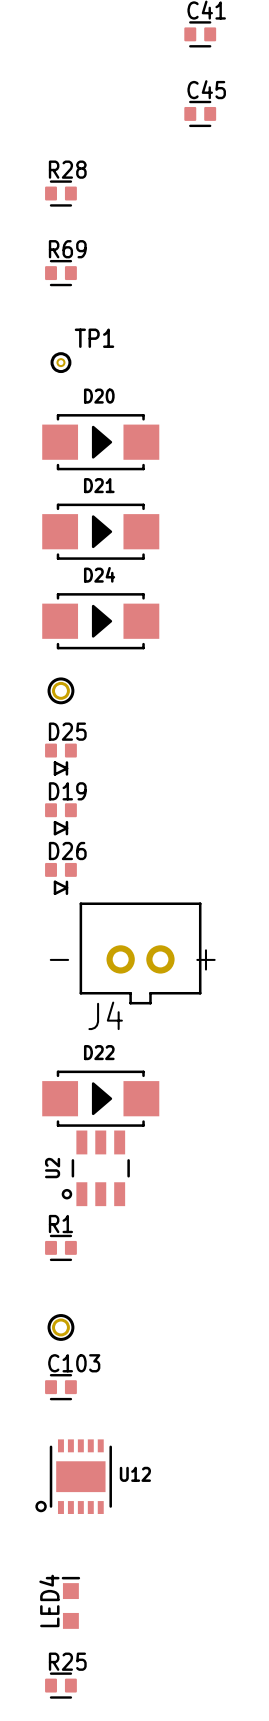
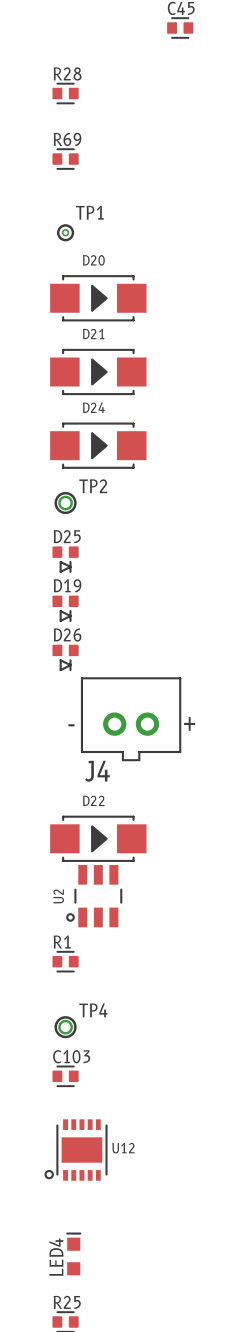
TP2 name: none -> TP2 (93, 486)
TP4 name: none -> TP4 (93, 1010)

